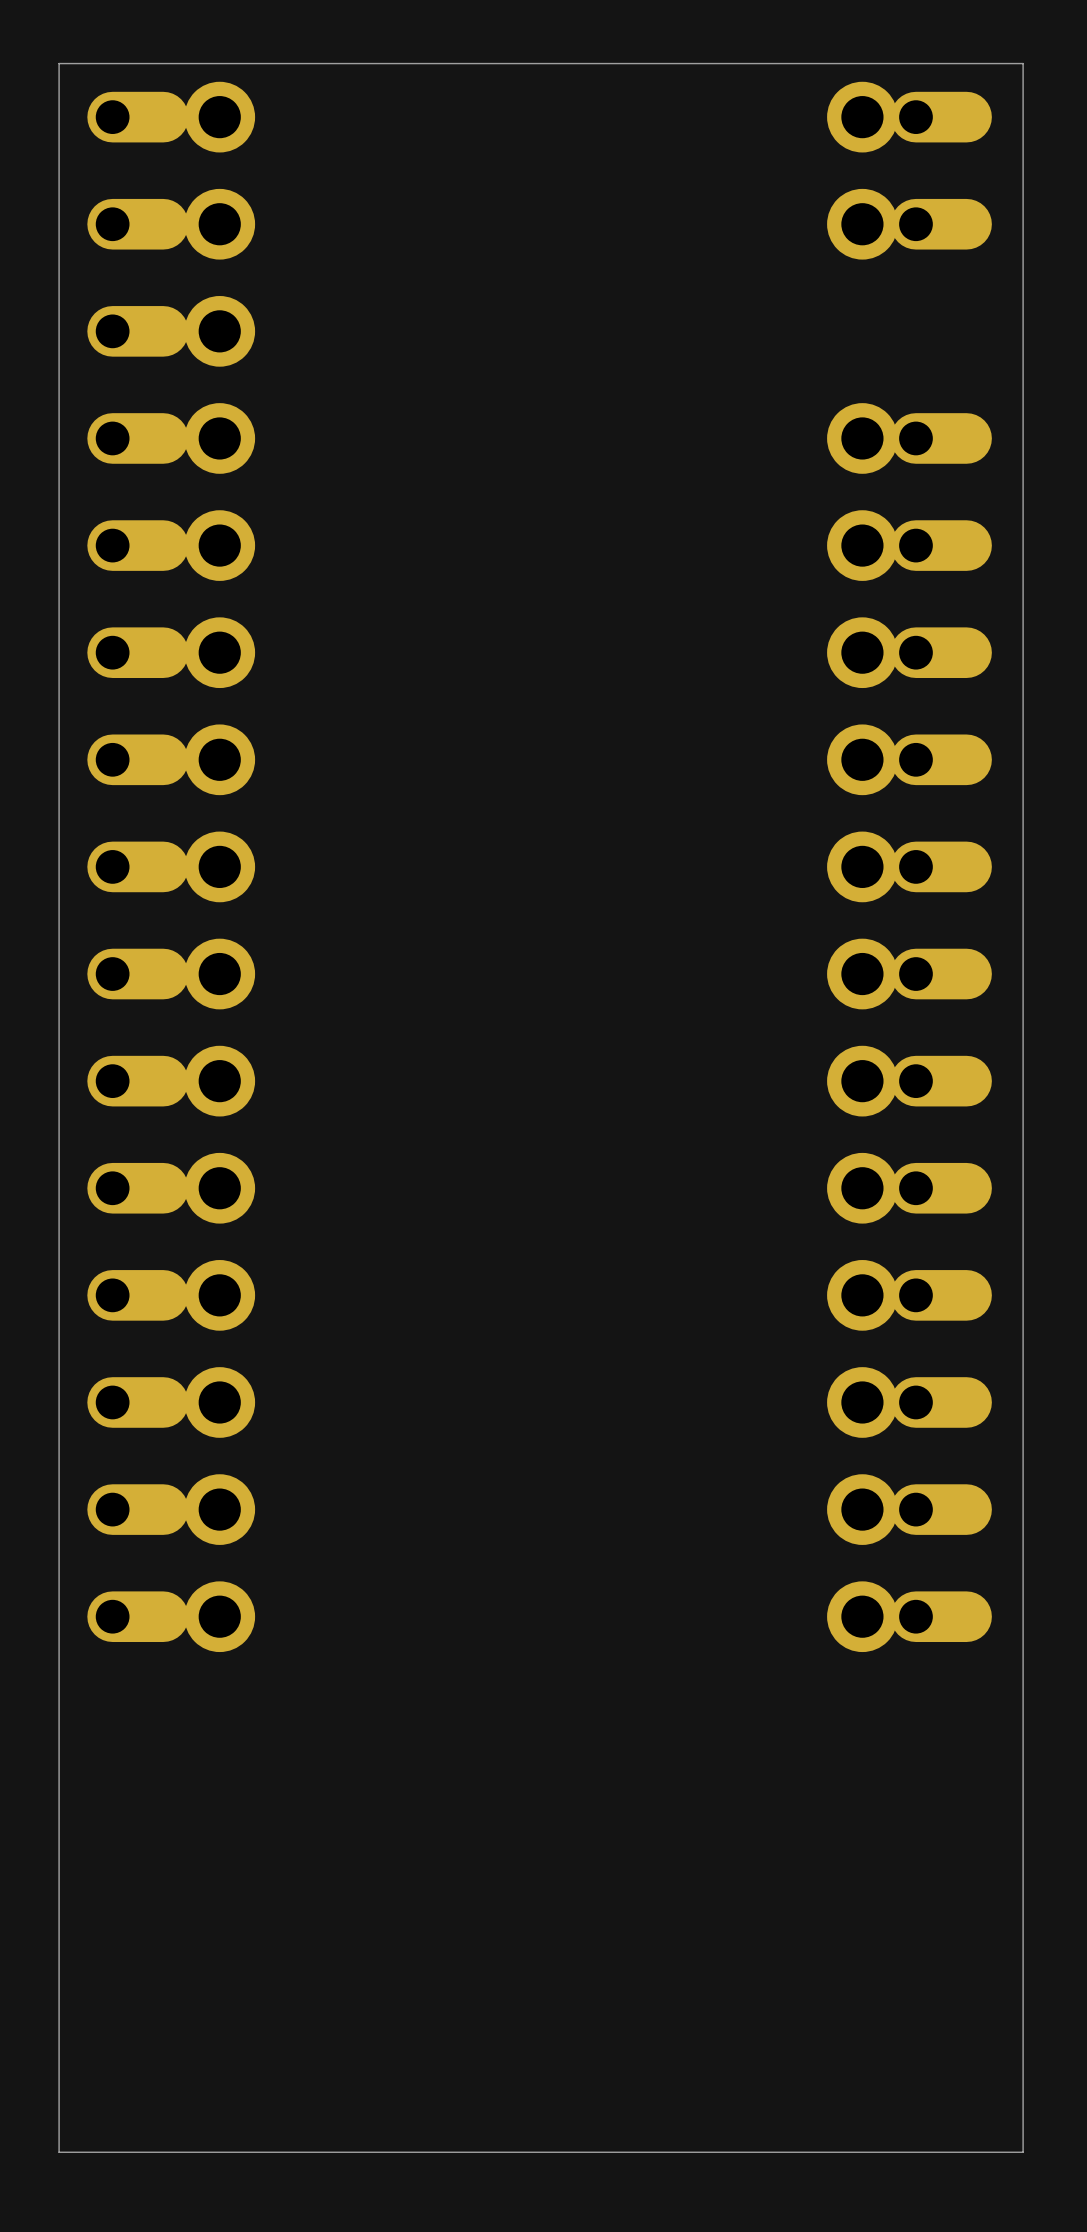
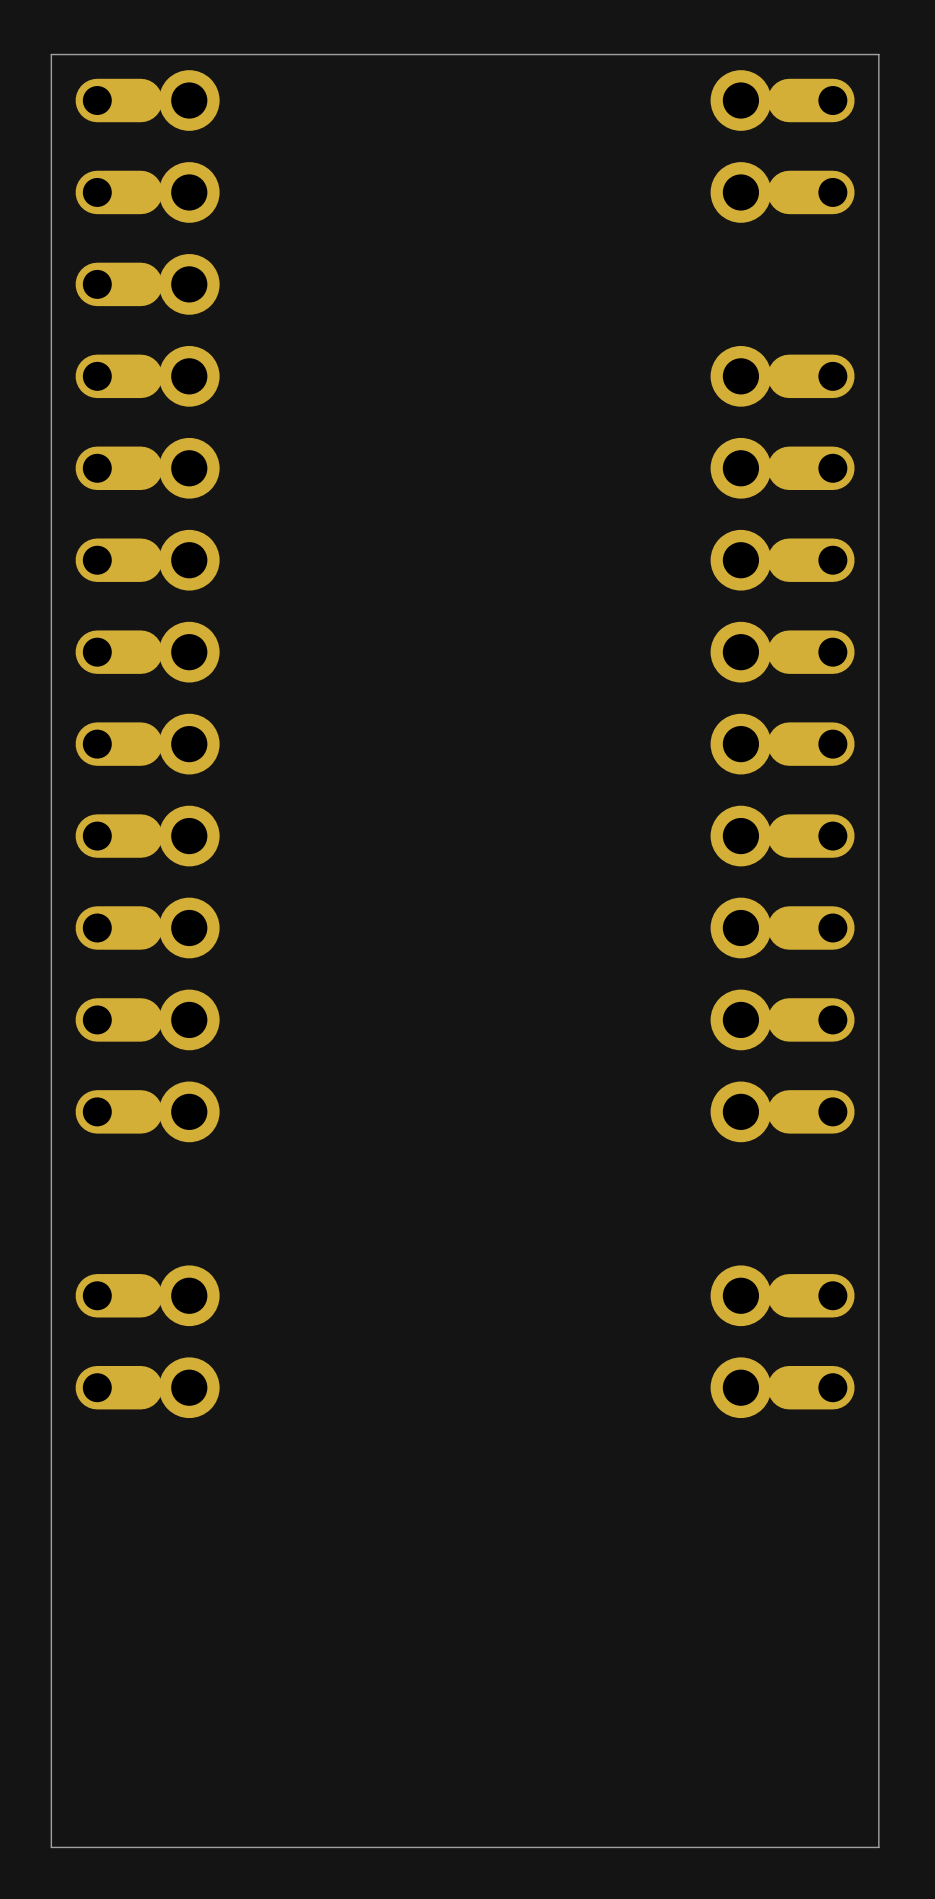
part side: top (941, 170) -> bottom (811, 146)
part: (137, 866) -> none
part: (219, 866) -> none
part: none -> (740, 744)
part: none -> (811, 744)
part position: (862, 1027) -> (189, 606)
part position: (941, 1027) -> (119, 606)
part: none -> (740, 1341)
part: none -> (811, 1341)

